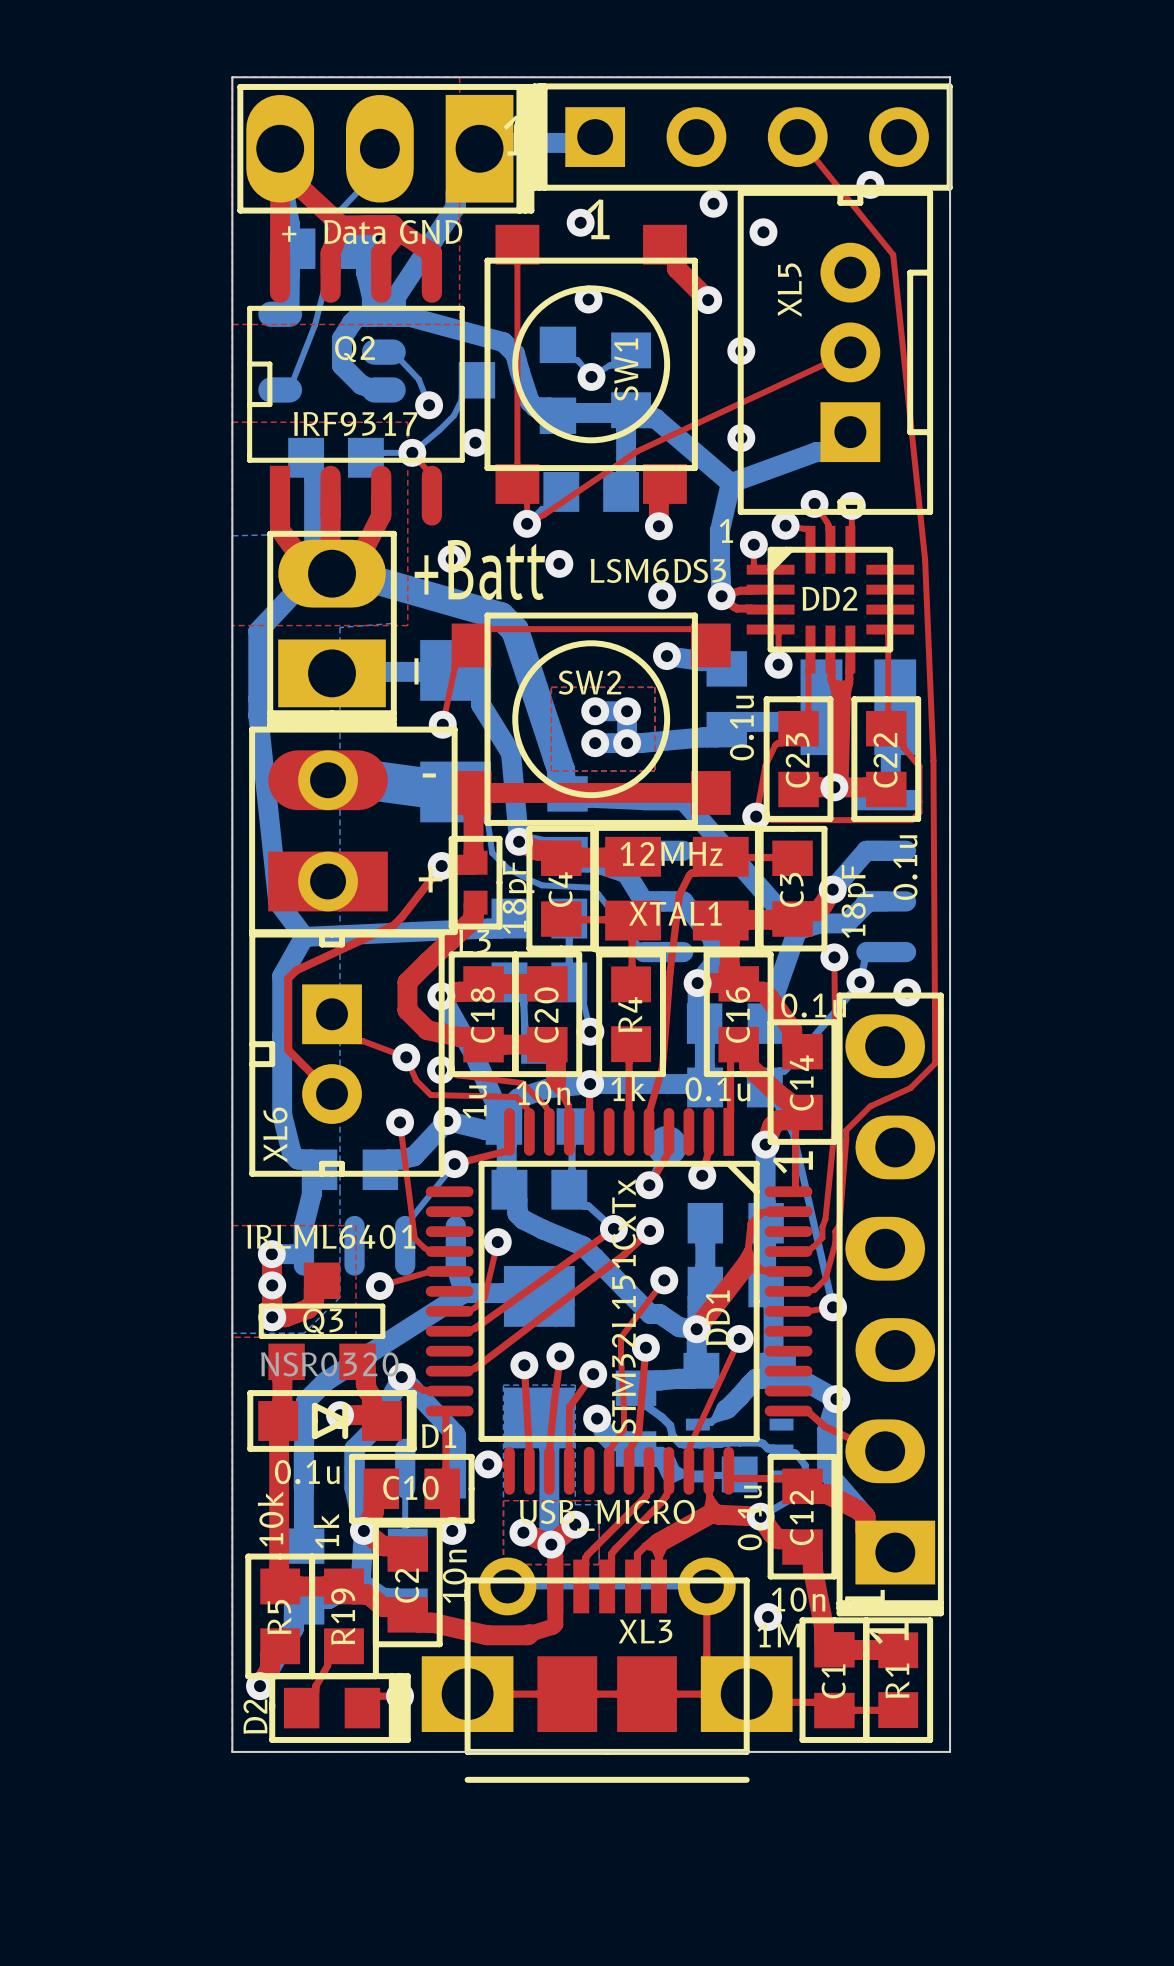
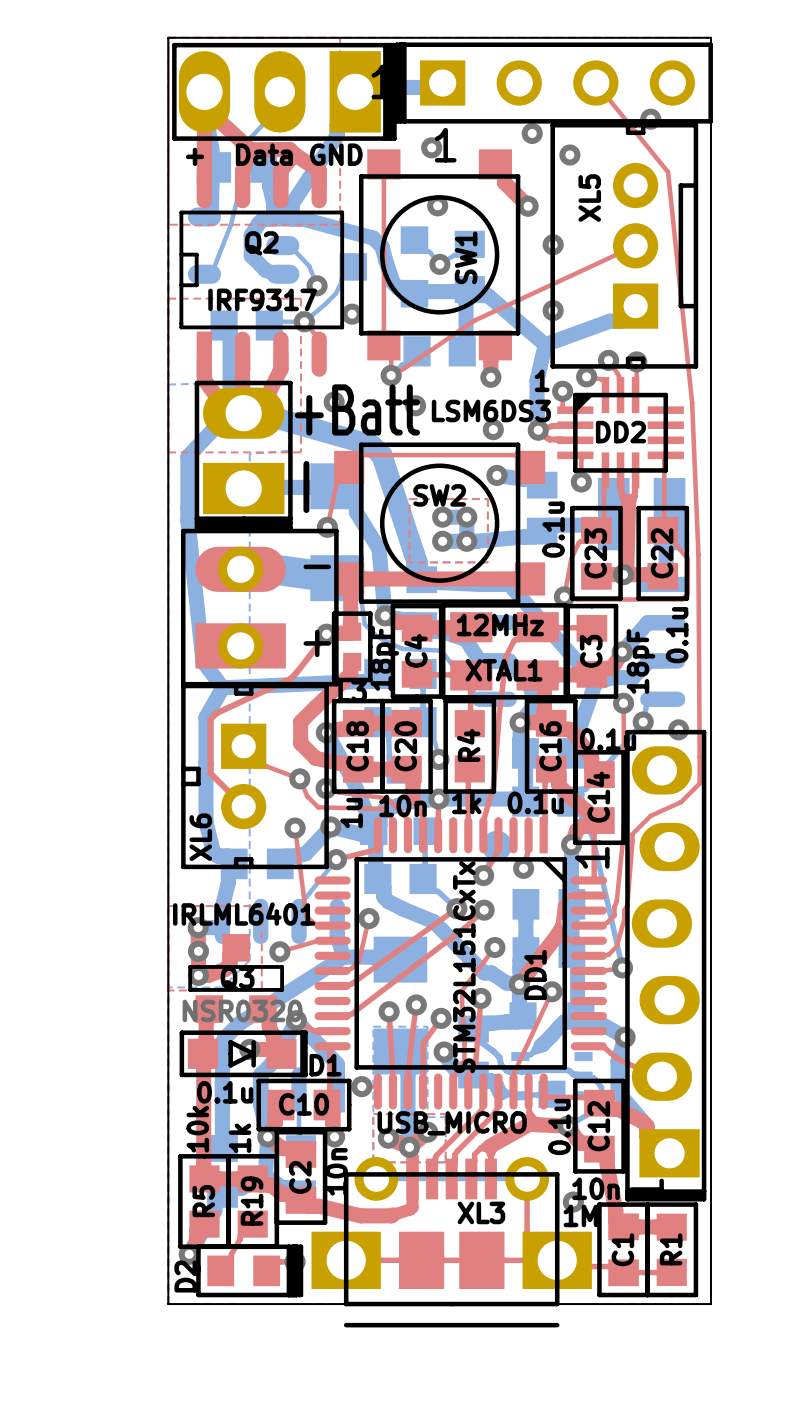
part text: 1 (888, 1633) -> none

